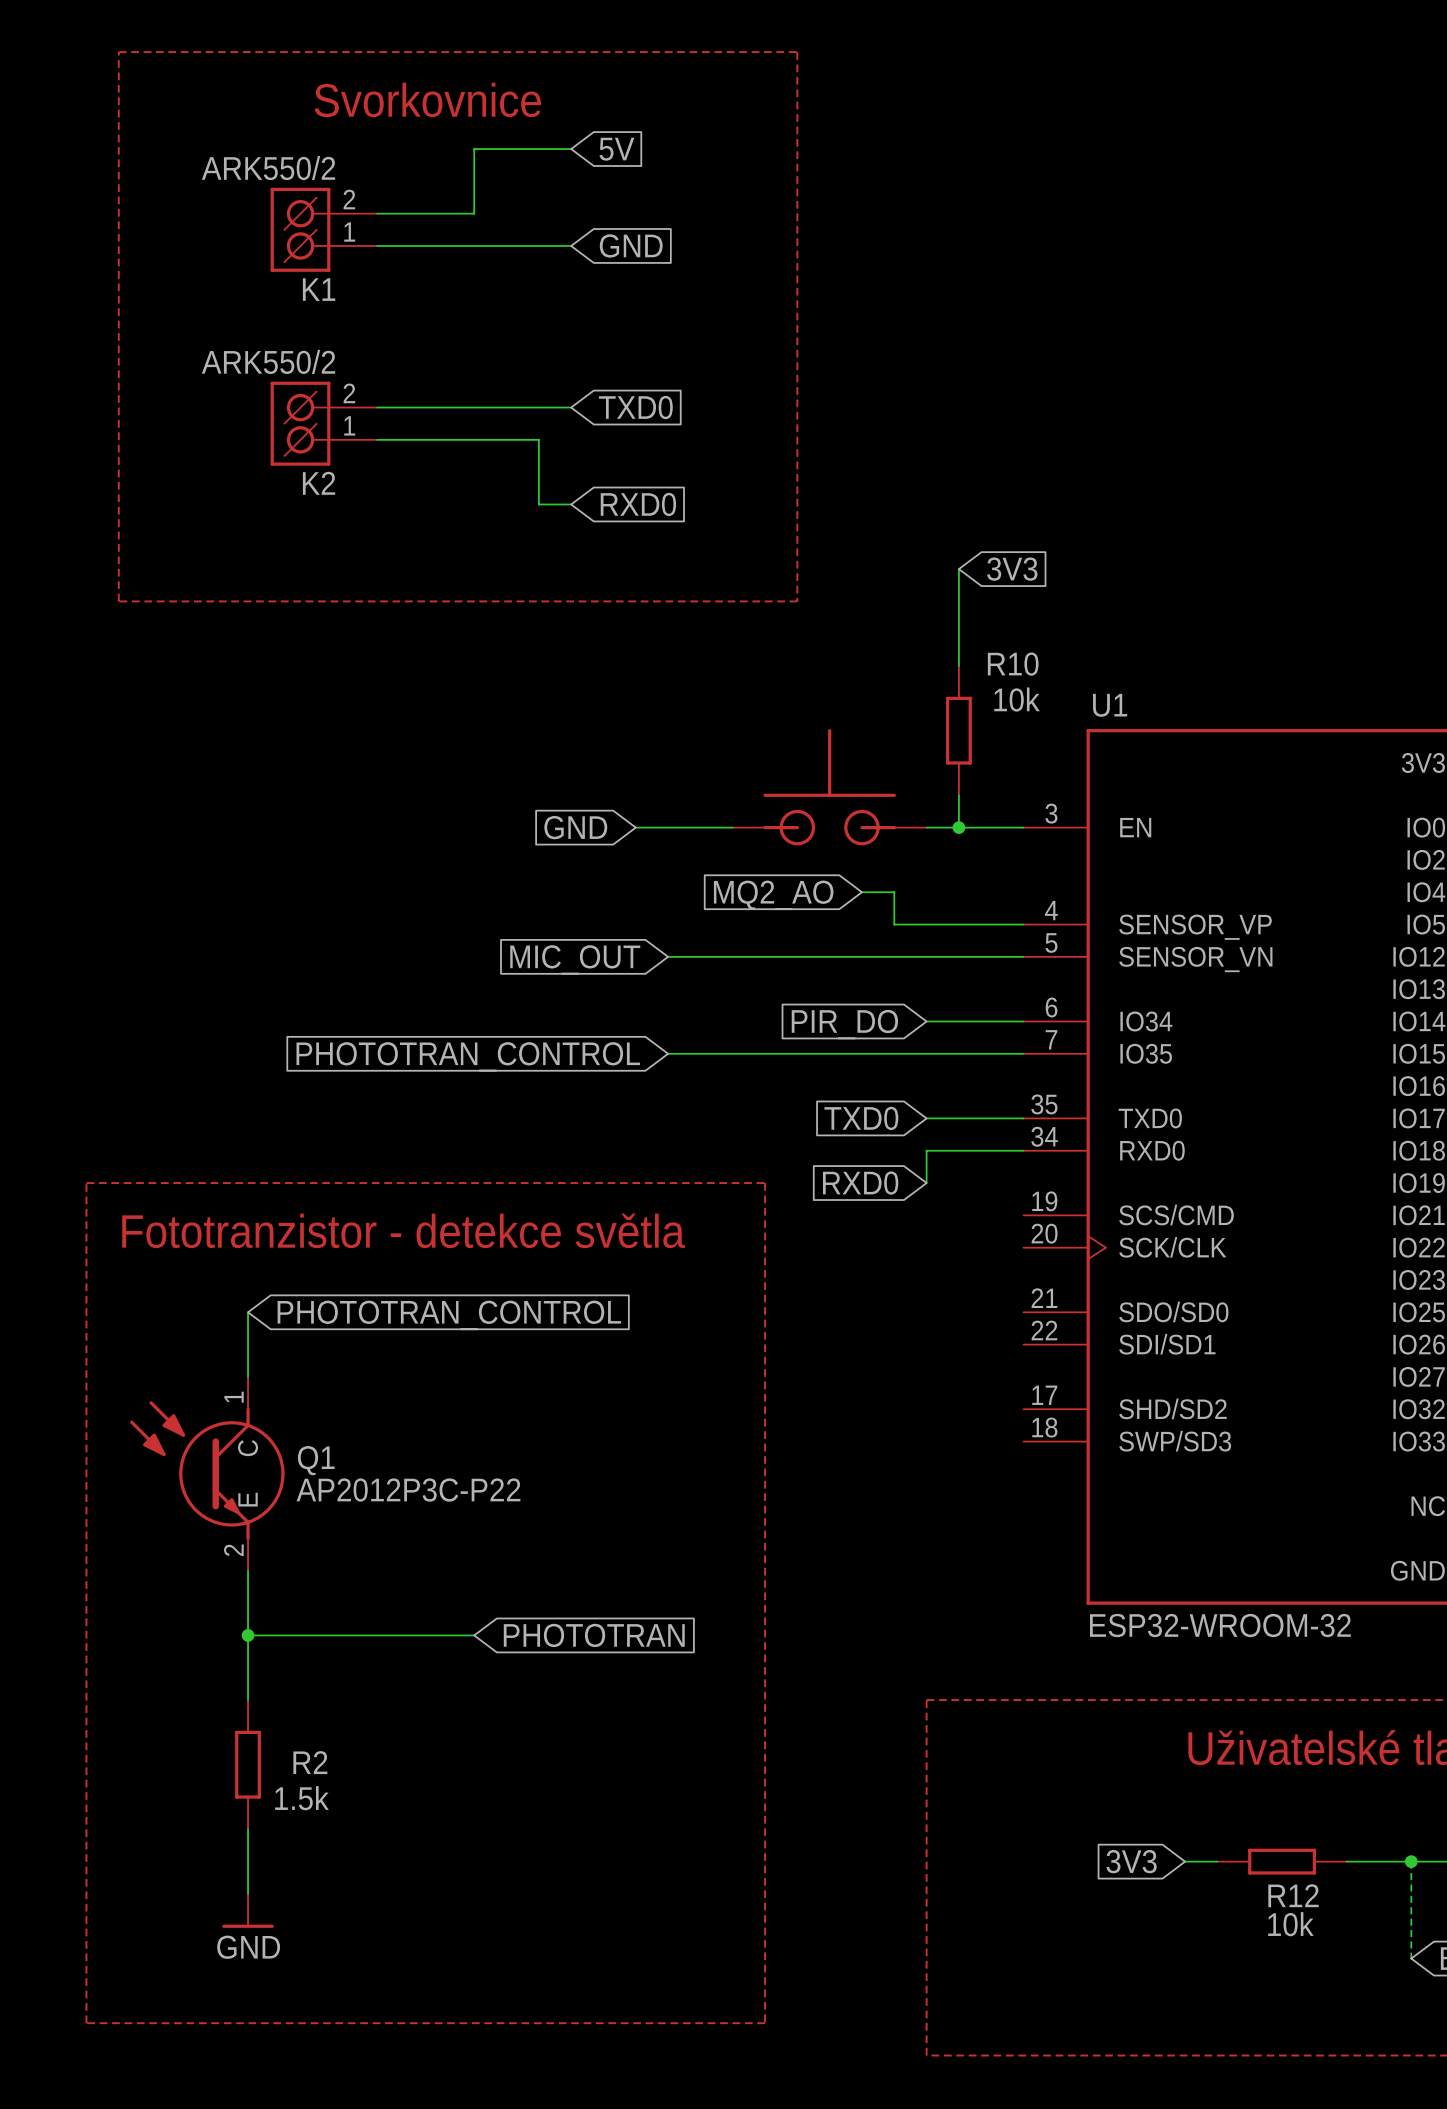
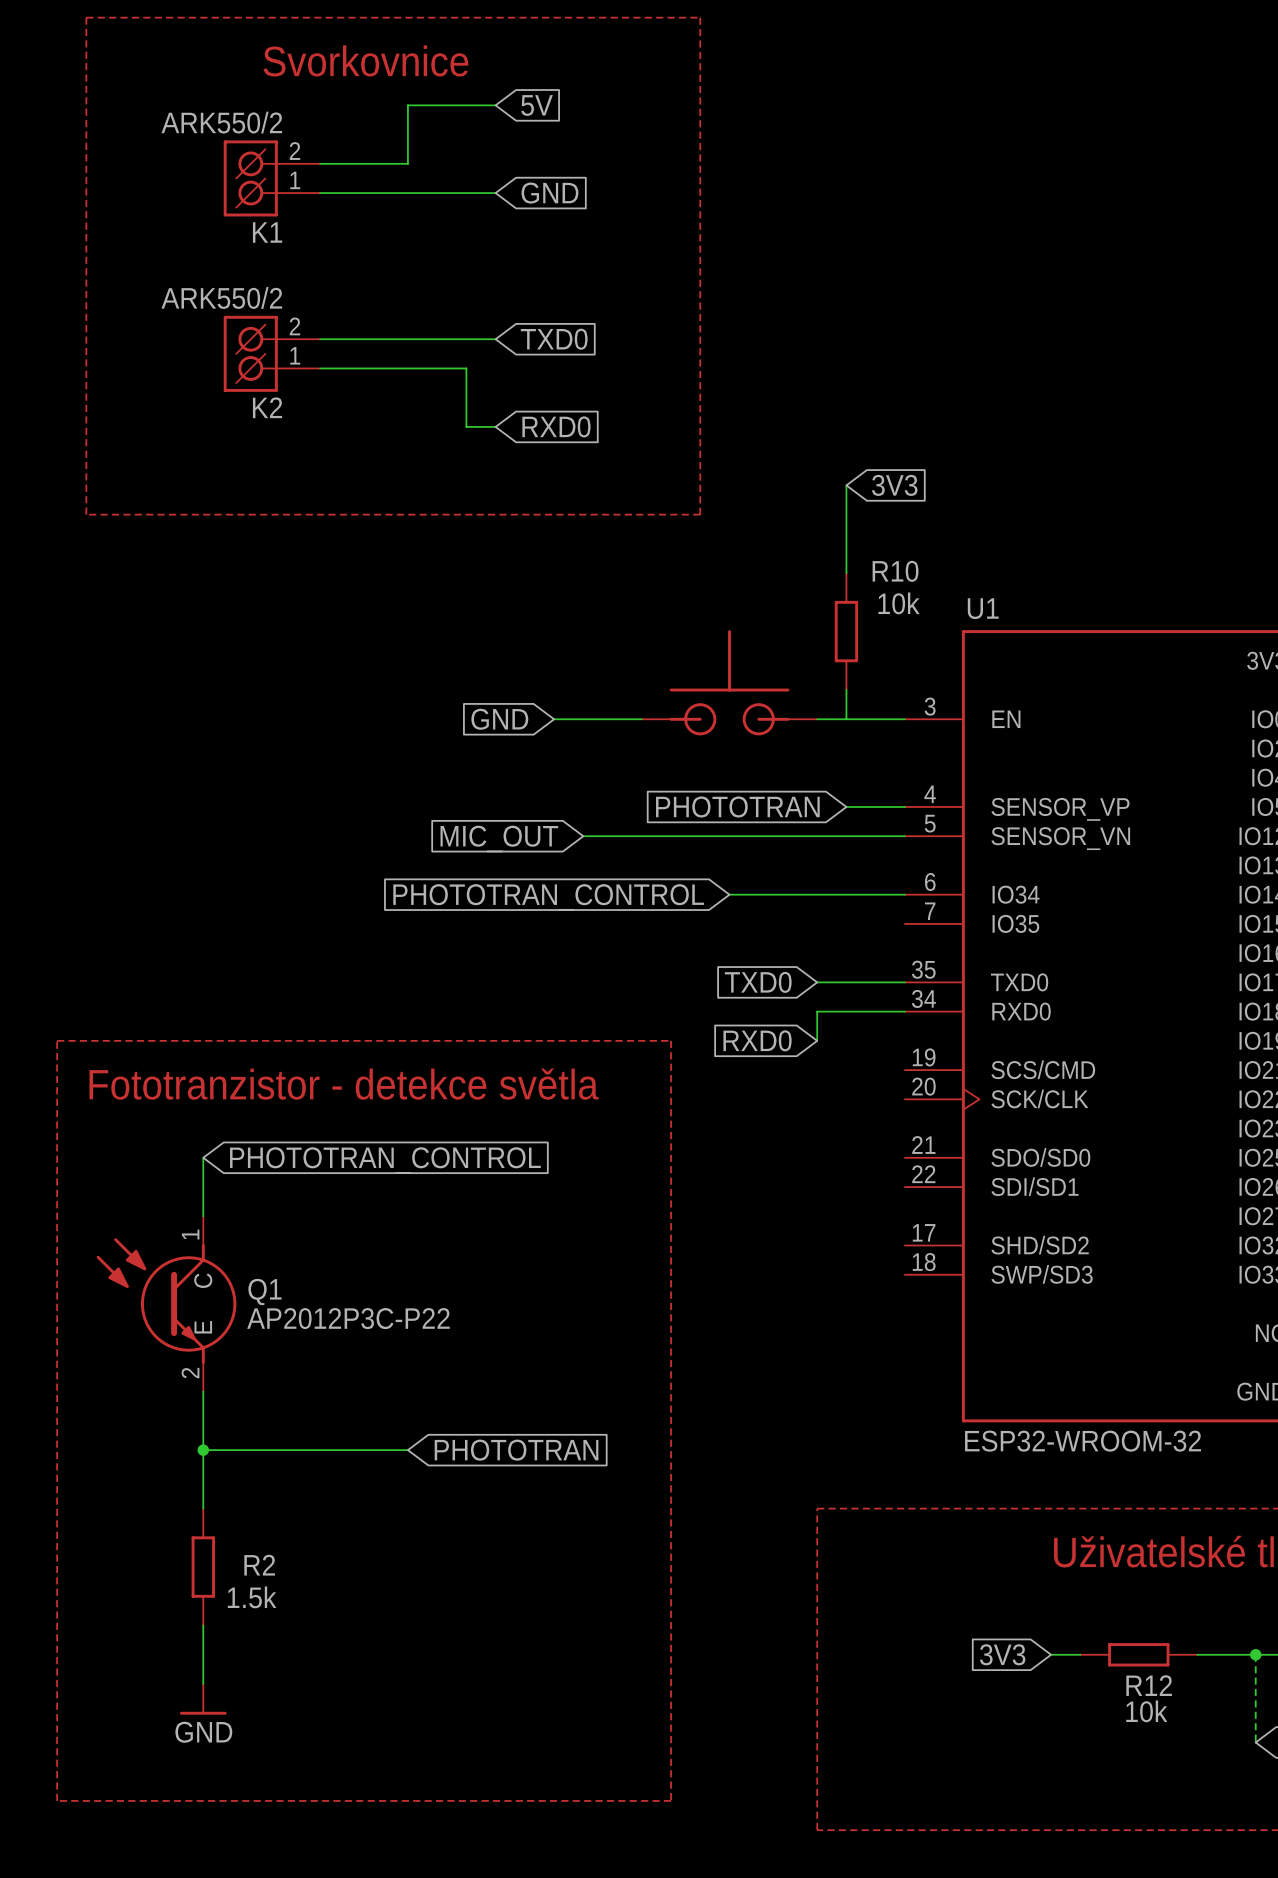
junction: (958, 827) -> none
wire: (861, 892) (894, 892) (894, 924) (958, 924) -> none
global label: MQ2_AO (773, 895) -> none
global label: none -> PHOTOTRAN (737, 806)
wire: none -> (729, 894) (817, 894)
global label: PIR_DO (844, 1024) -> none
wire: (668, 1053) (1023, 1053) -> none
global label position: PHOTOTRAN_CONTROL (468, 1056) -> PHOTOTRAN_CONTROL (548, 897)

